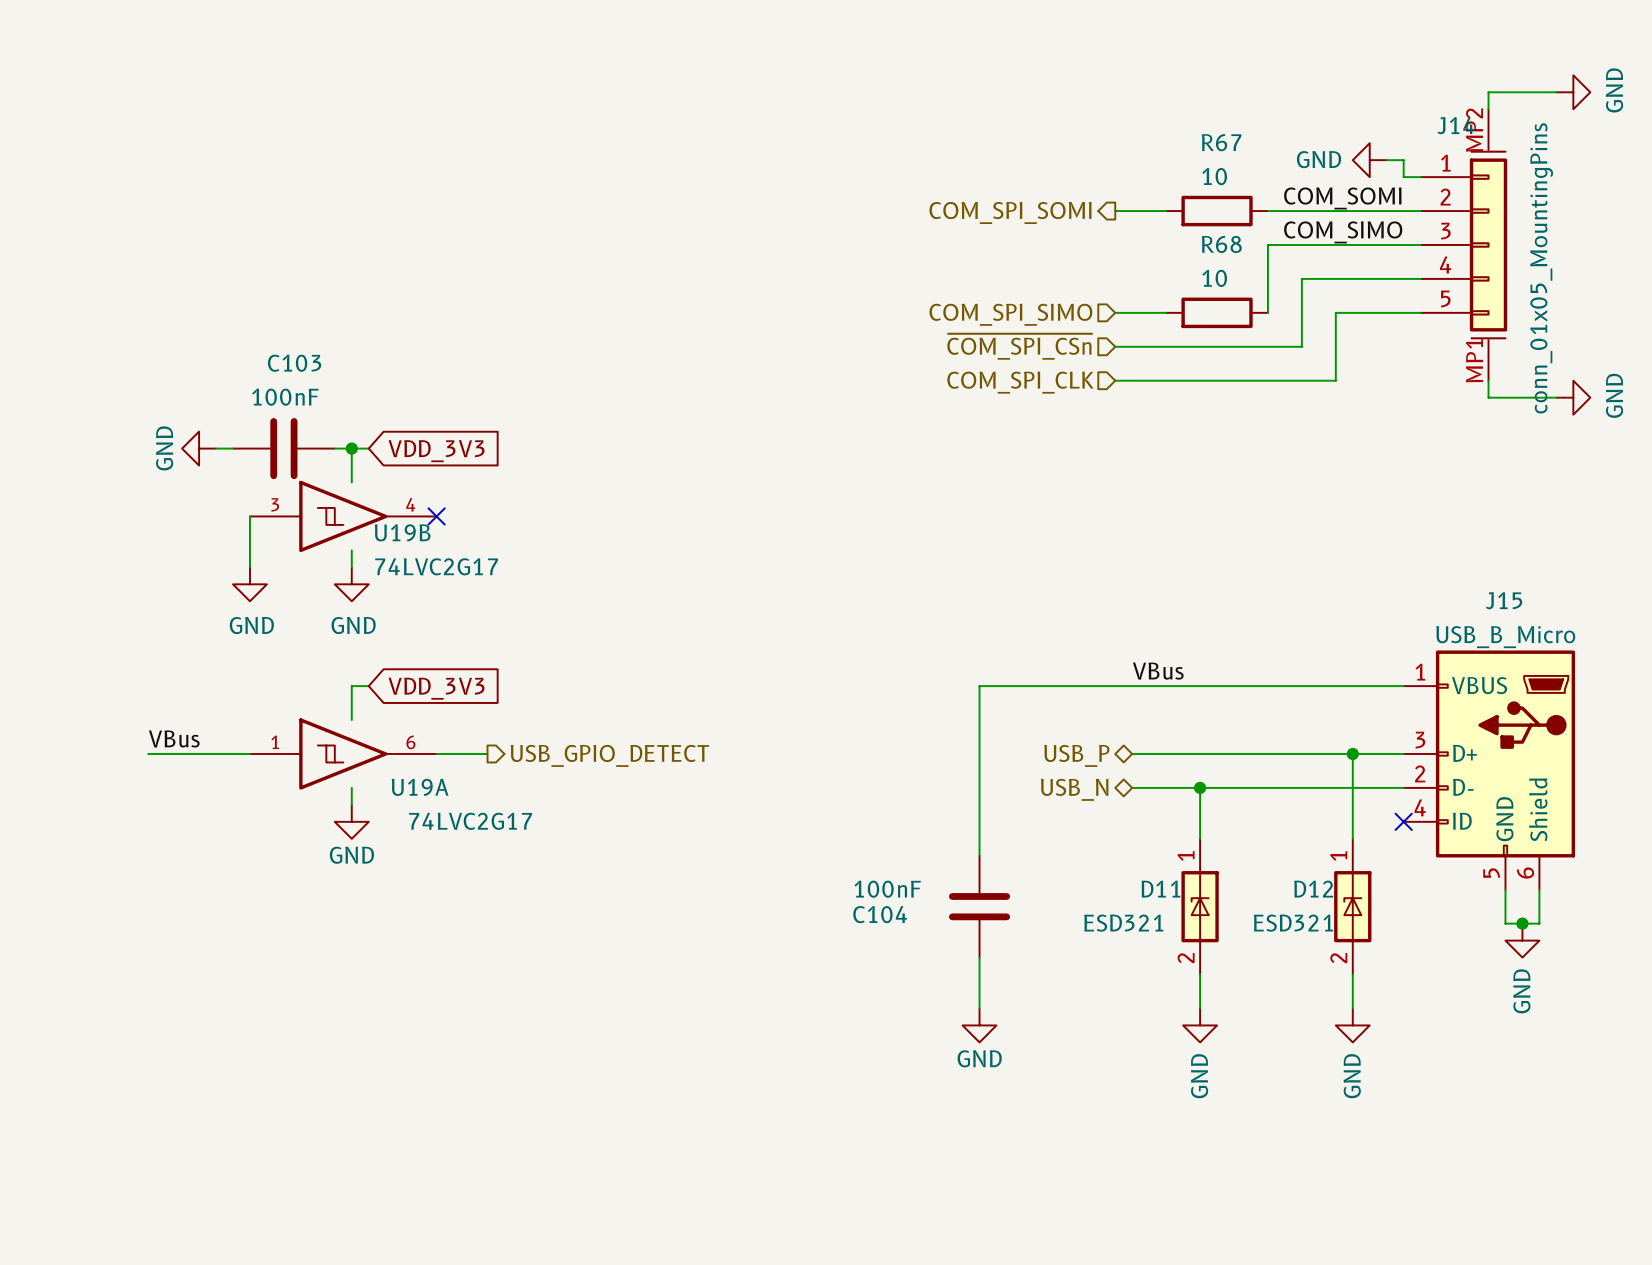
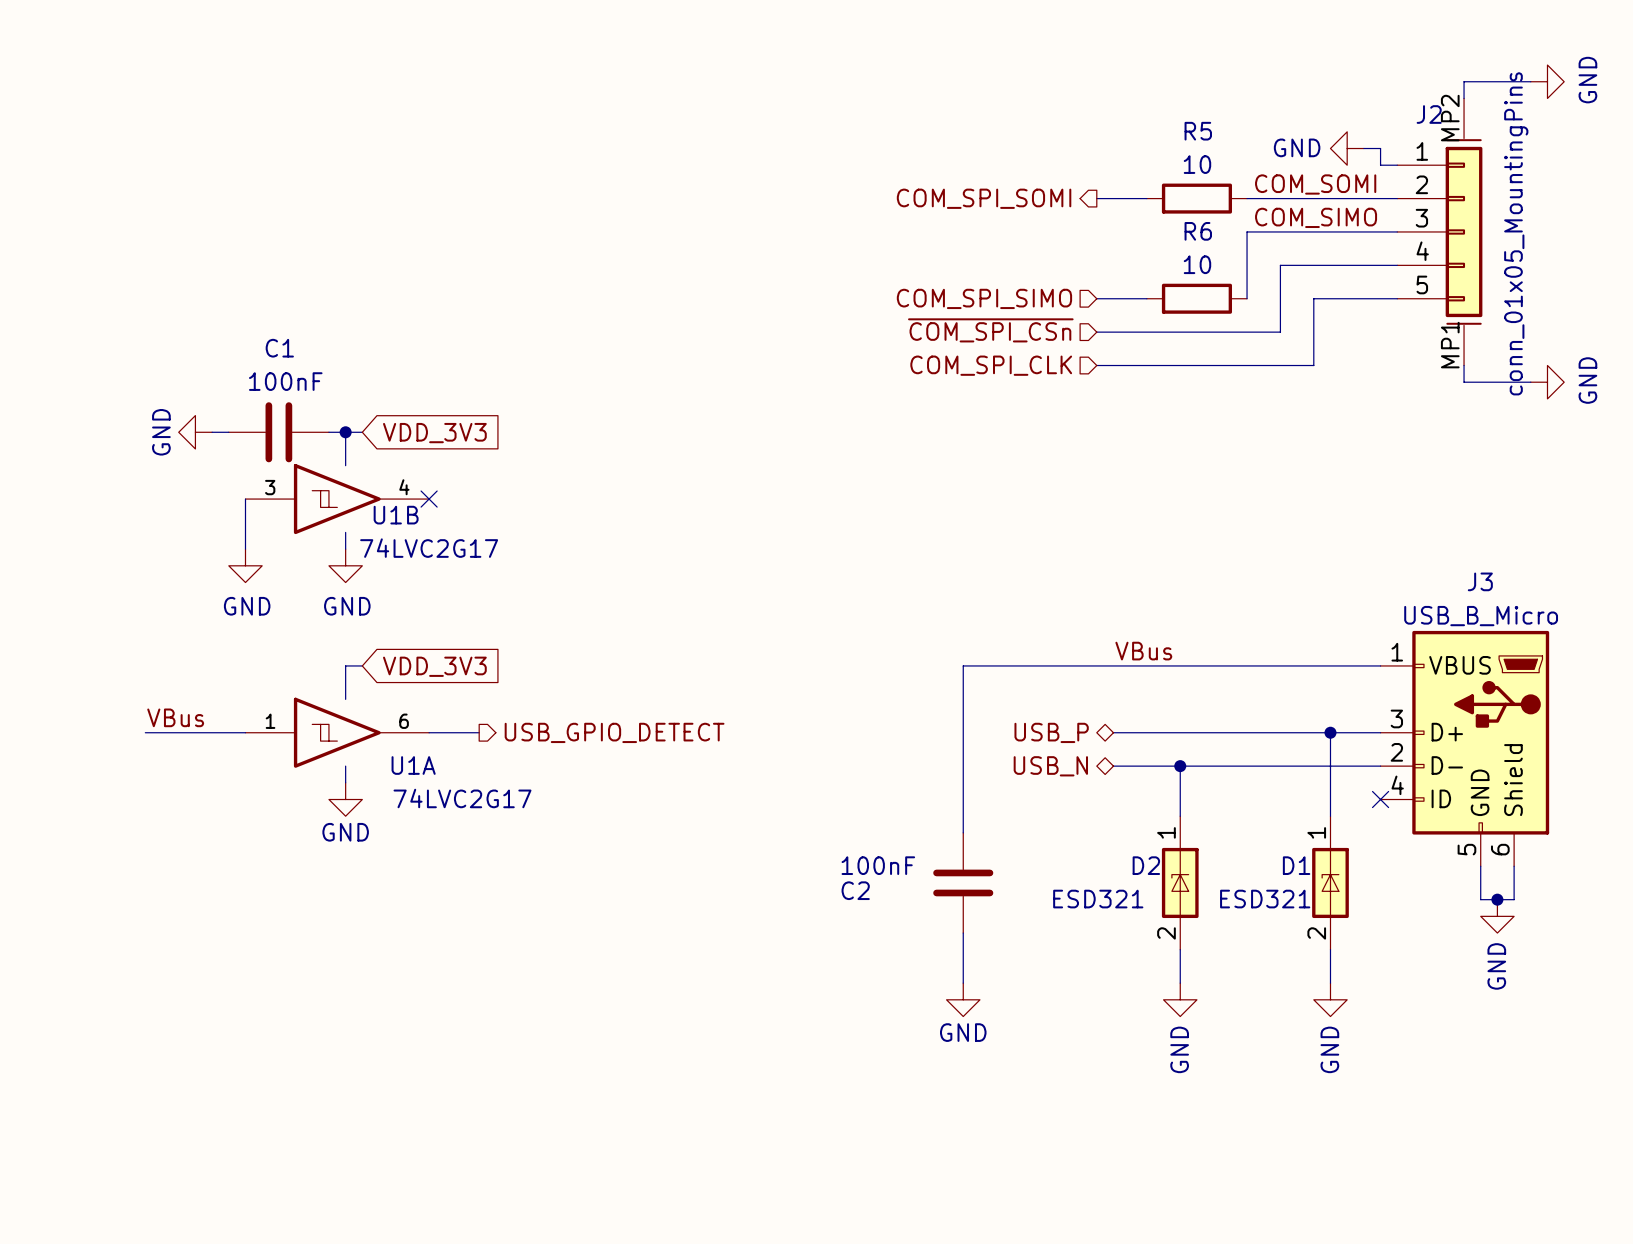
J14 name: J14 (1456, 125) -> J2 (1429, 114)
R67 name: R67 (1221, 142) -> R5 (1198, 131)
R68 name: R68 (1221, 244) -> R6 (1198, 231)
C103 name: C103 (294, 363) -> C1 (279, 348)
U19B name: U19B (402, 532) -> U1B (396, 515)
J15 name: J15 (1504, 600) -> J3 (1480, 581)
U19A name: U19A (420, 787) -> U1A (413, 765)
D11 name: D11 (1160, 889) -> D2 (1146, 865)
D12 name: D12 (1313, 889) -> D1 (1296, 865)
C104 name: C104 (880, 914) -> C2 (855, 890)

